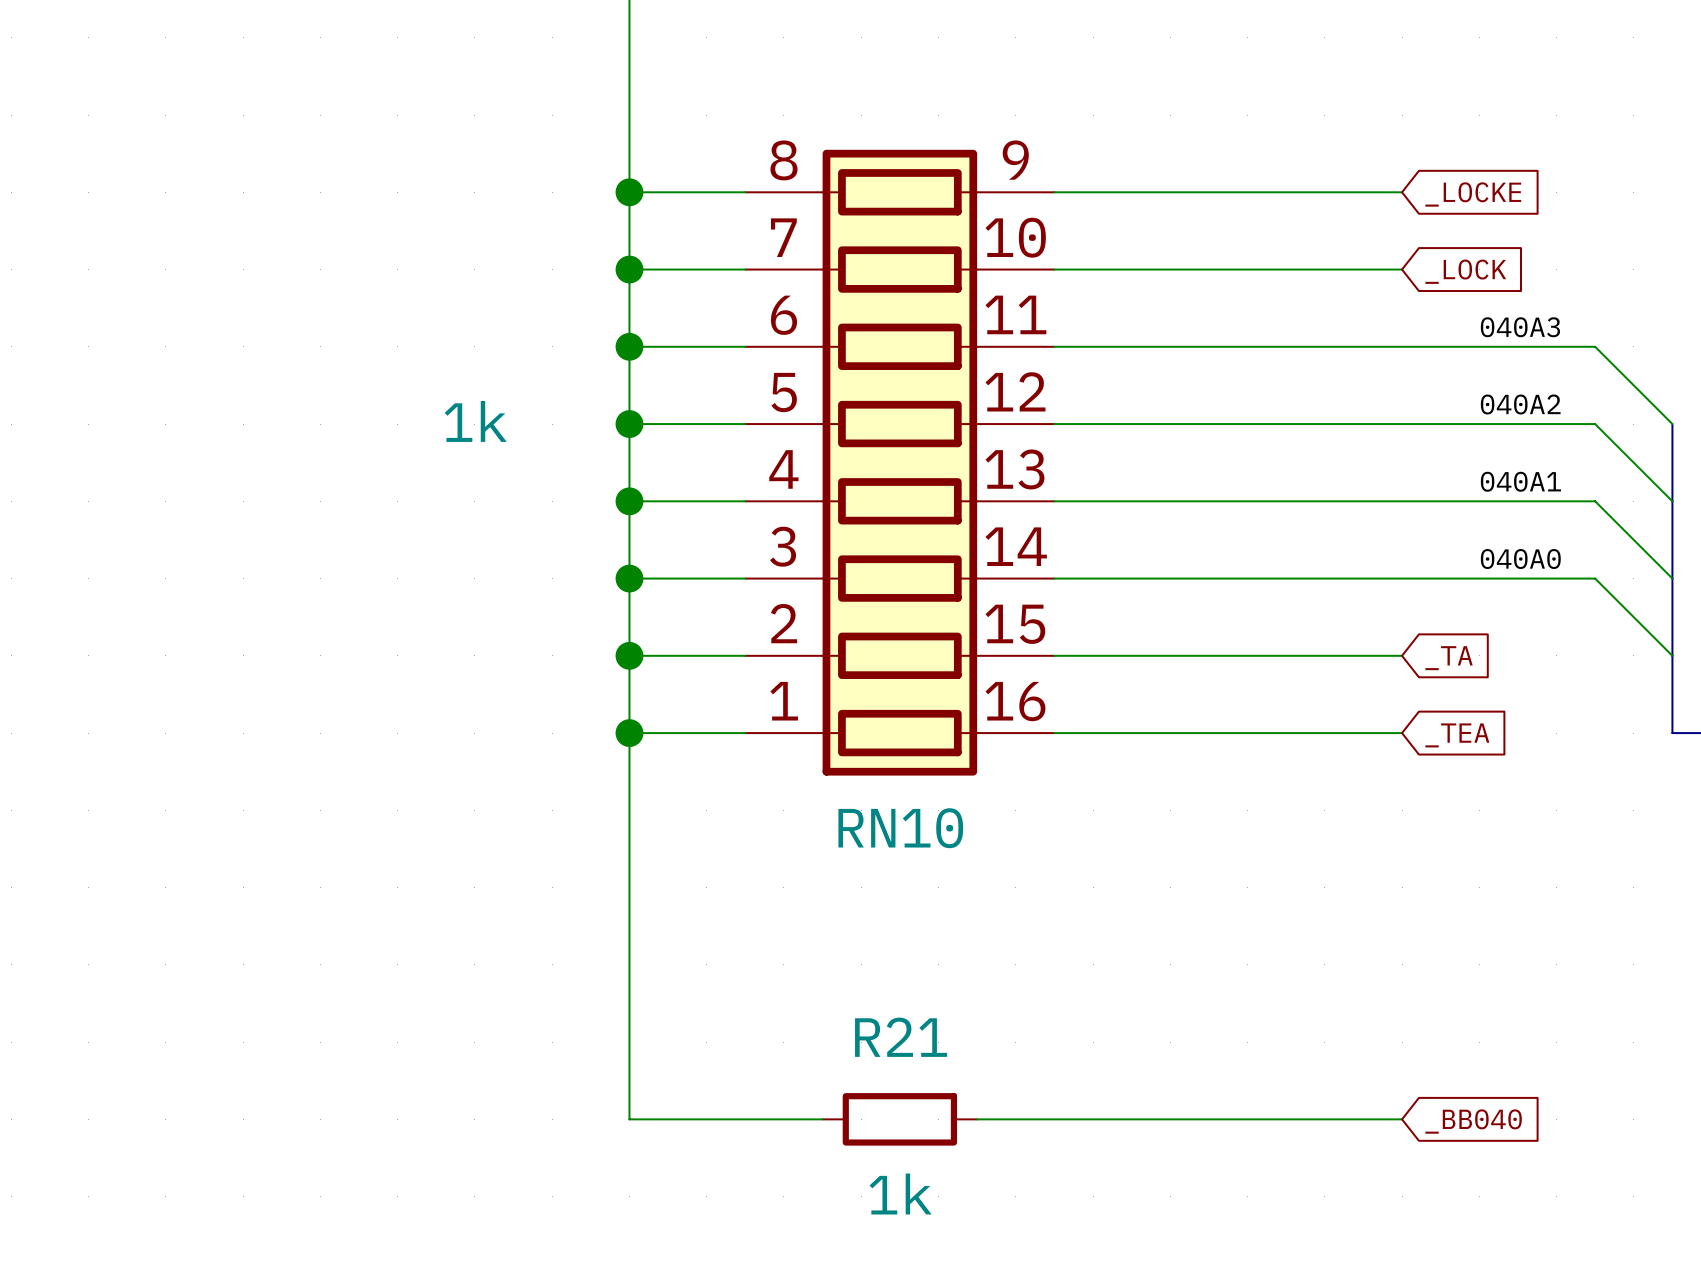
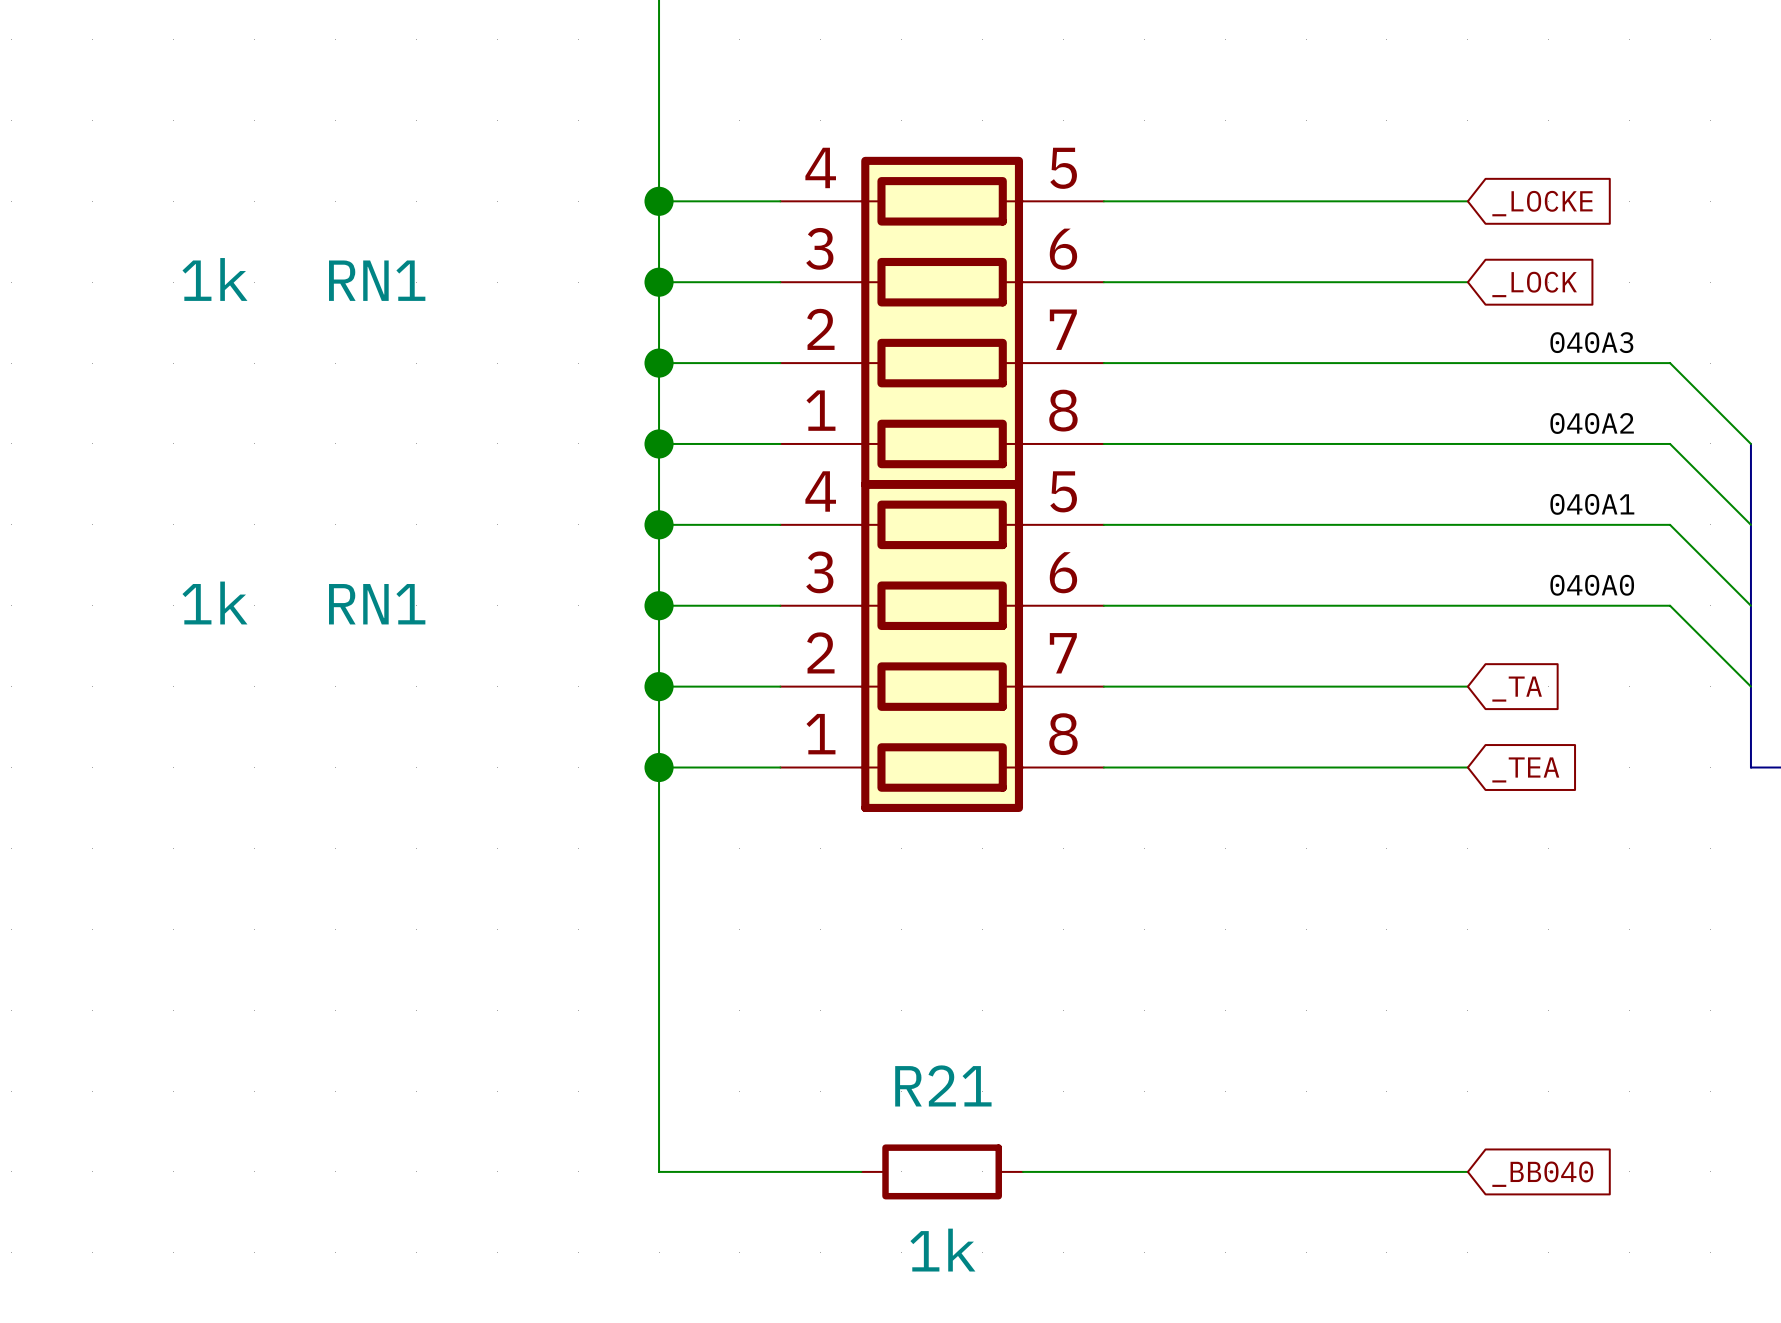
RN1: none -> 1k (942, 322)
RN10: 1k (899, 462) -> none
RN1: none -> 1k (942, 646)

